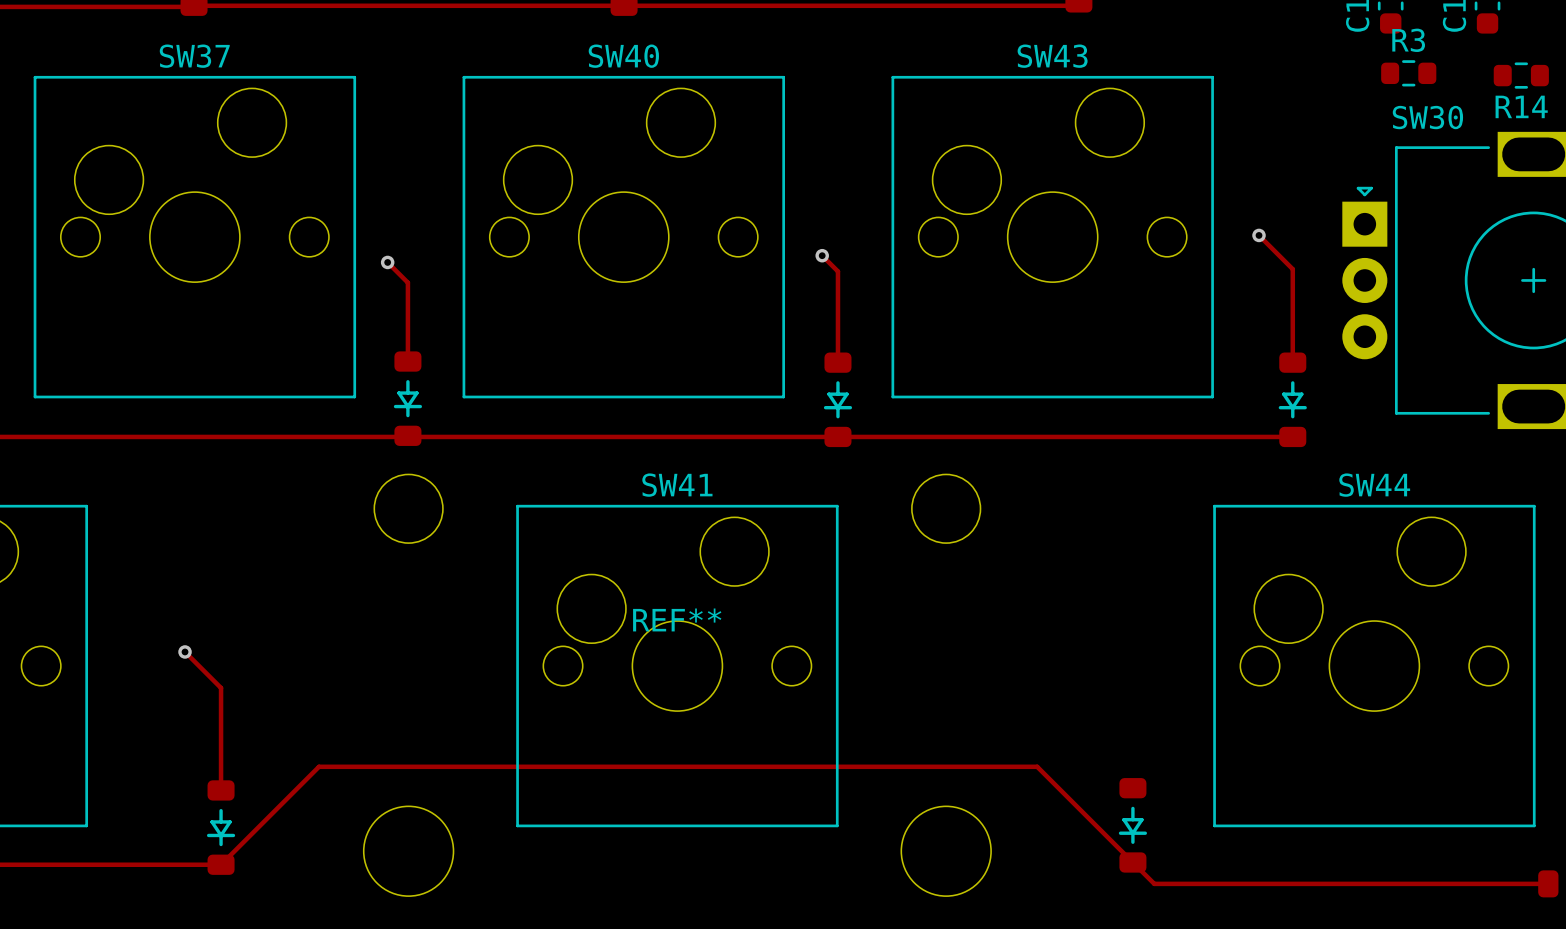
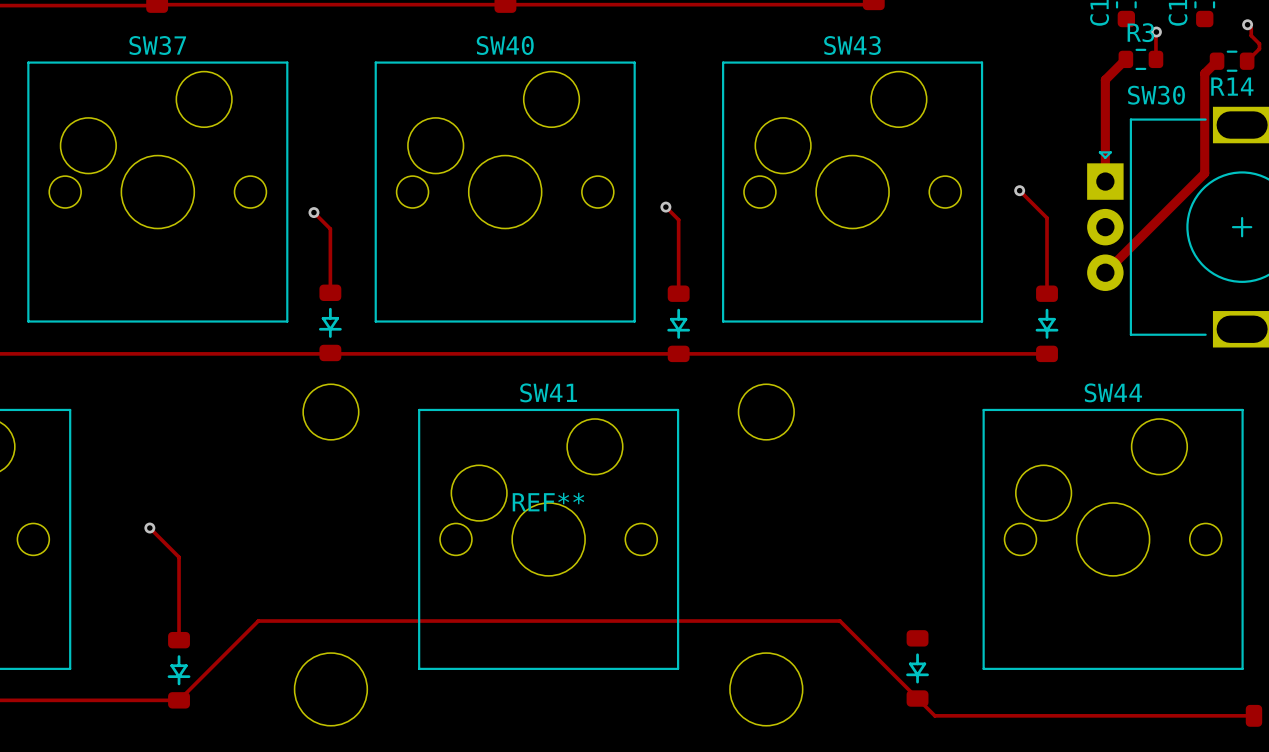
track: none -> (1247, 24) (1251, 28) (1251, 35) (1259, 43) (1259, 48) (1247, 61)
via: none -> (1247, 24)
track: none -> (1156, 32) (1155, 59)
via: none -> (1156, 32)
track: none -> (1125, 59) (1105, 79) (1105, 181)
track: none -> (1217, 61) (1204, 73) (1204, 173) (1105, 272)

